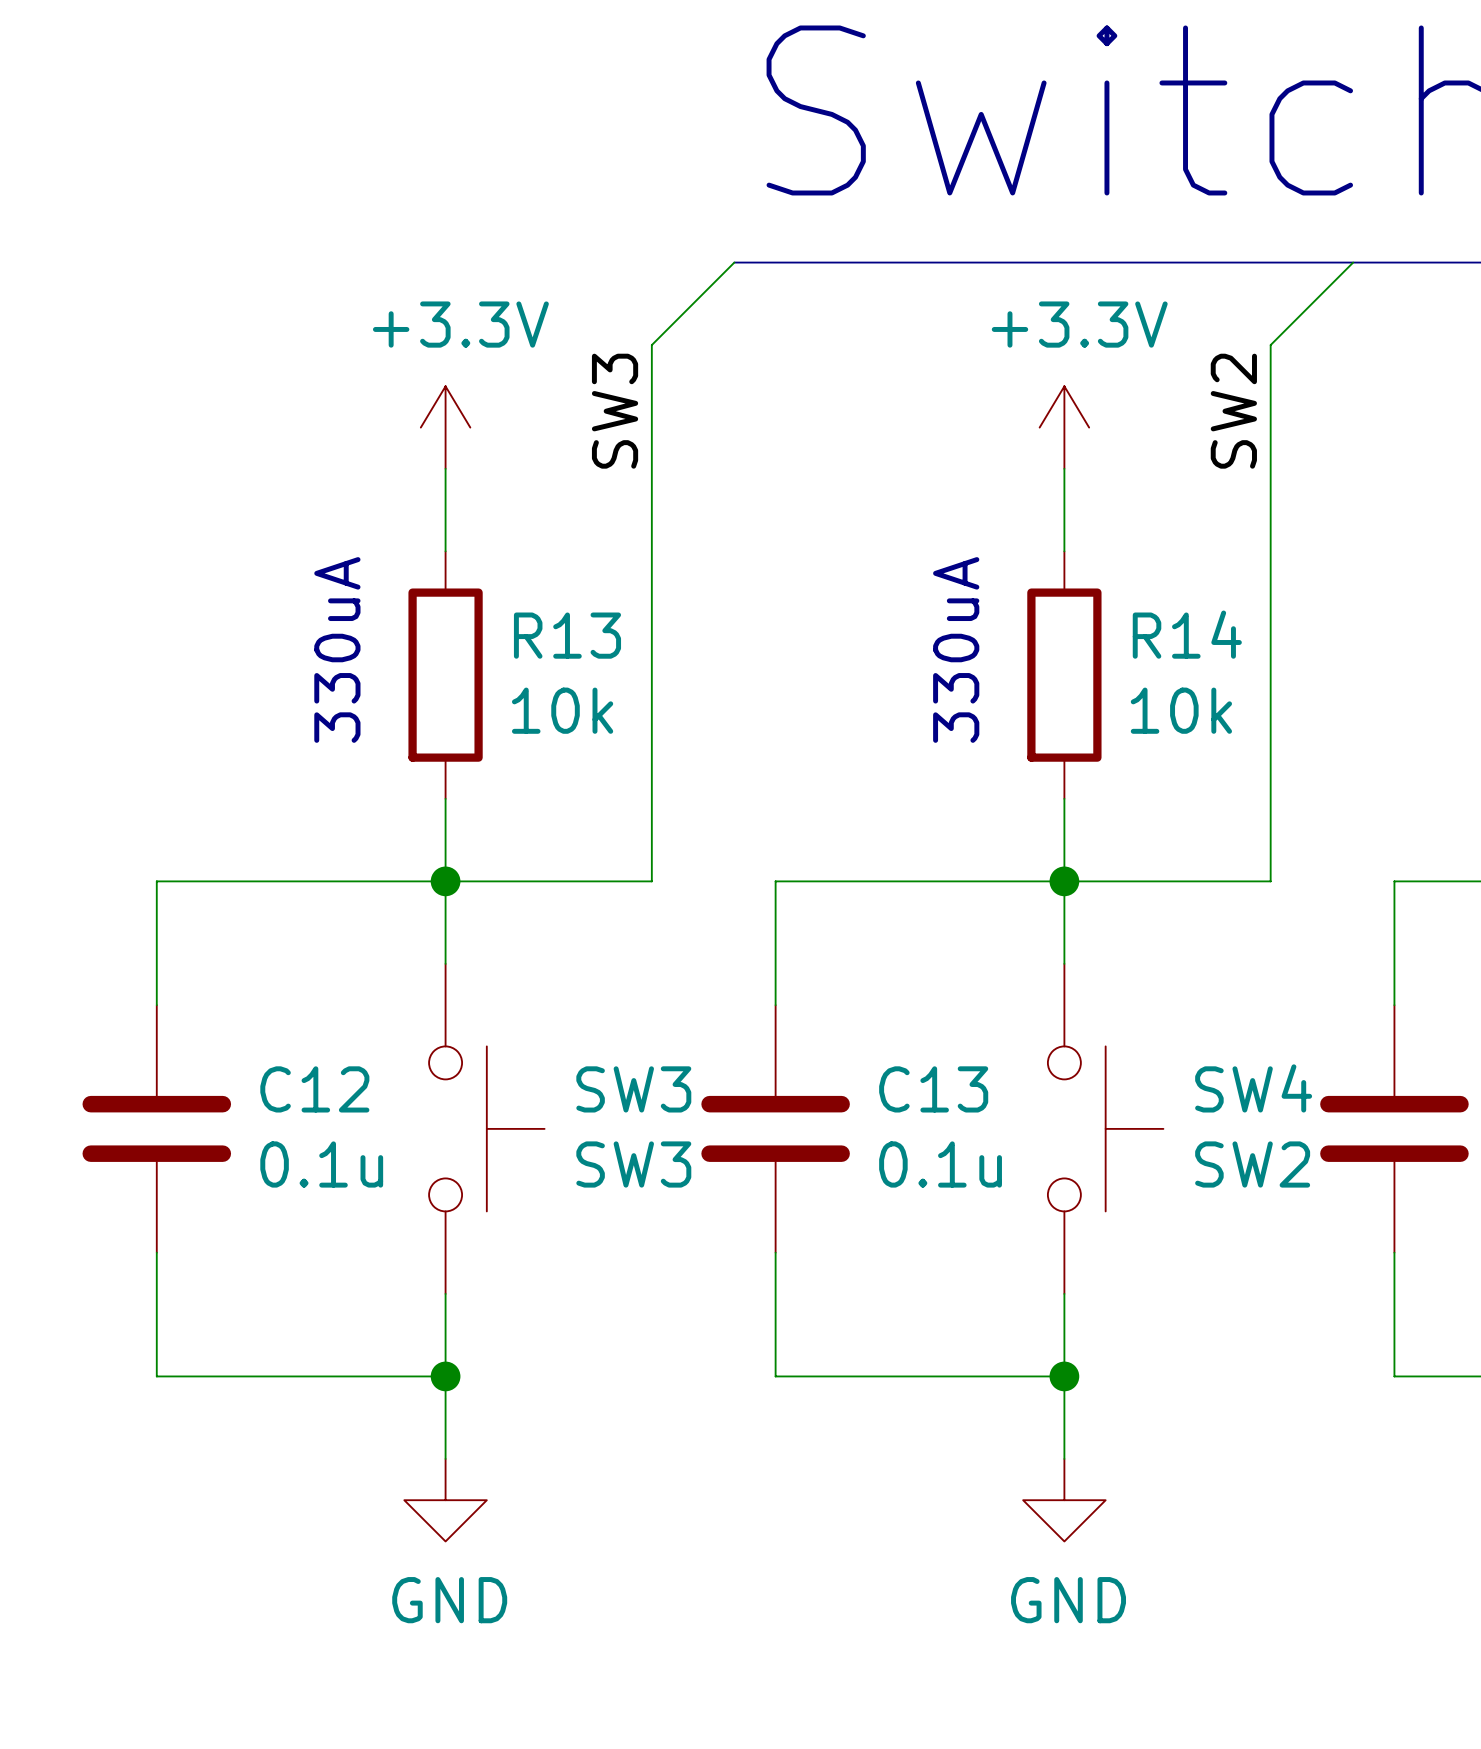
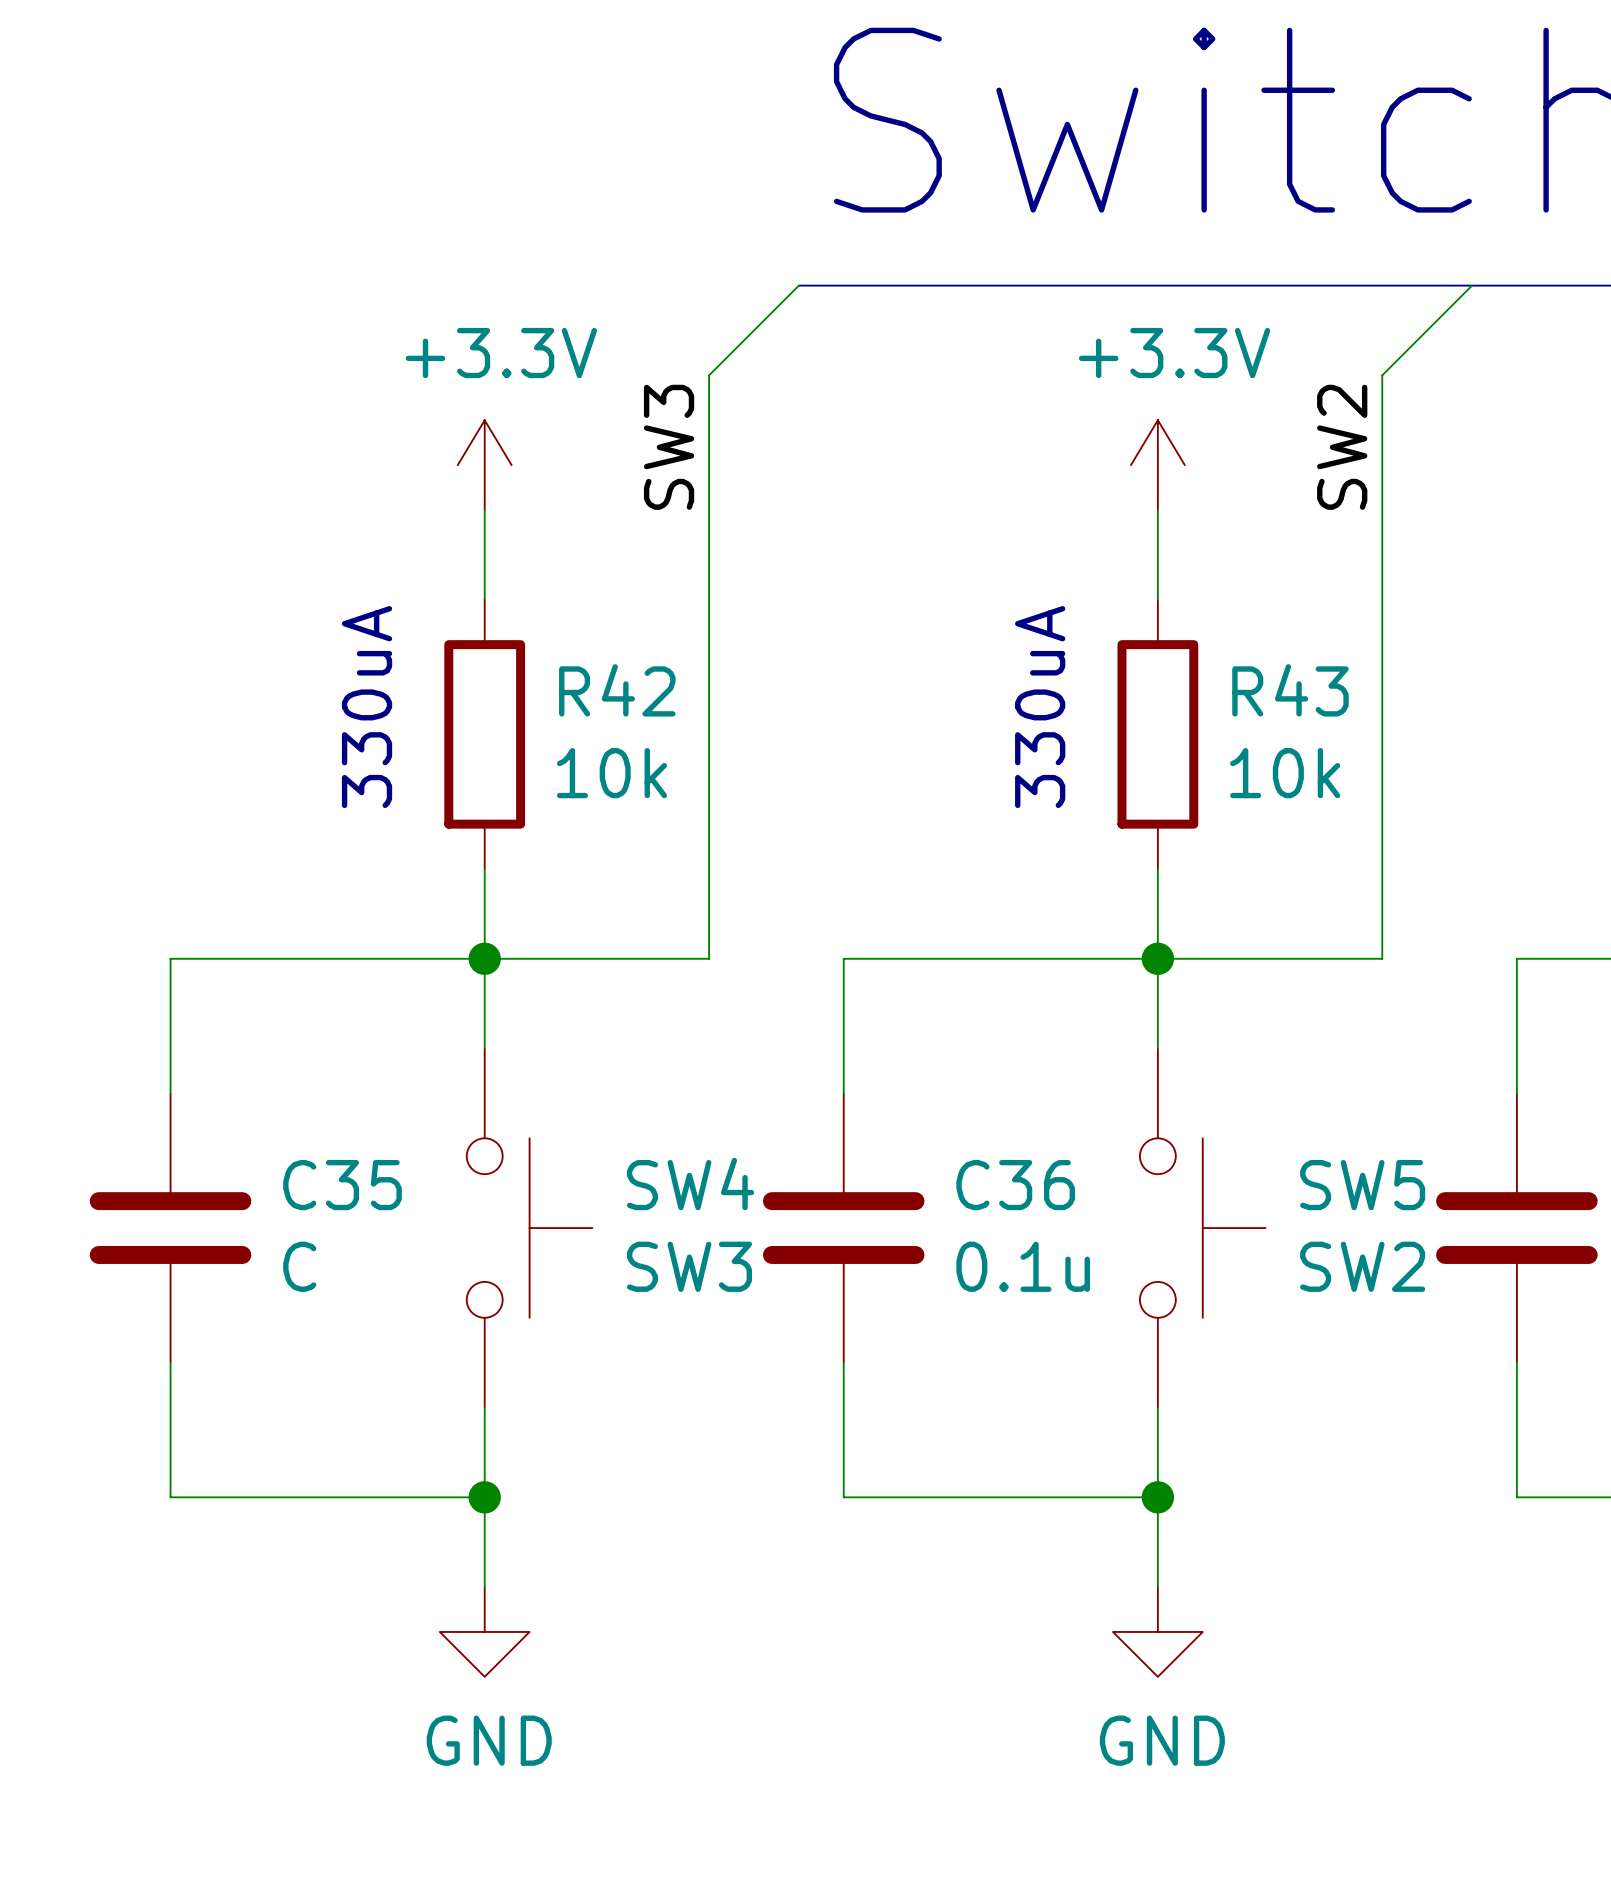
R14 name: R14 (1187, 634) -> R43 (1290, 690)
R13 name: R13 (567, 635) -> R42 (617, 690)
SW4 name: SW4 (1253, 1088) -> SW5 (1362, 1185)
C12 name: C12 (314, 1089) -> C35 (342, 1185)
SW3 name: SW3 (633, 1089) -> SW4 (690, 1184)
C13 name: C13 (933, 1089) -> C36 (1015, 1185)
C12 value: 0.1u (321, 1164) -> C (299, 1266)

